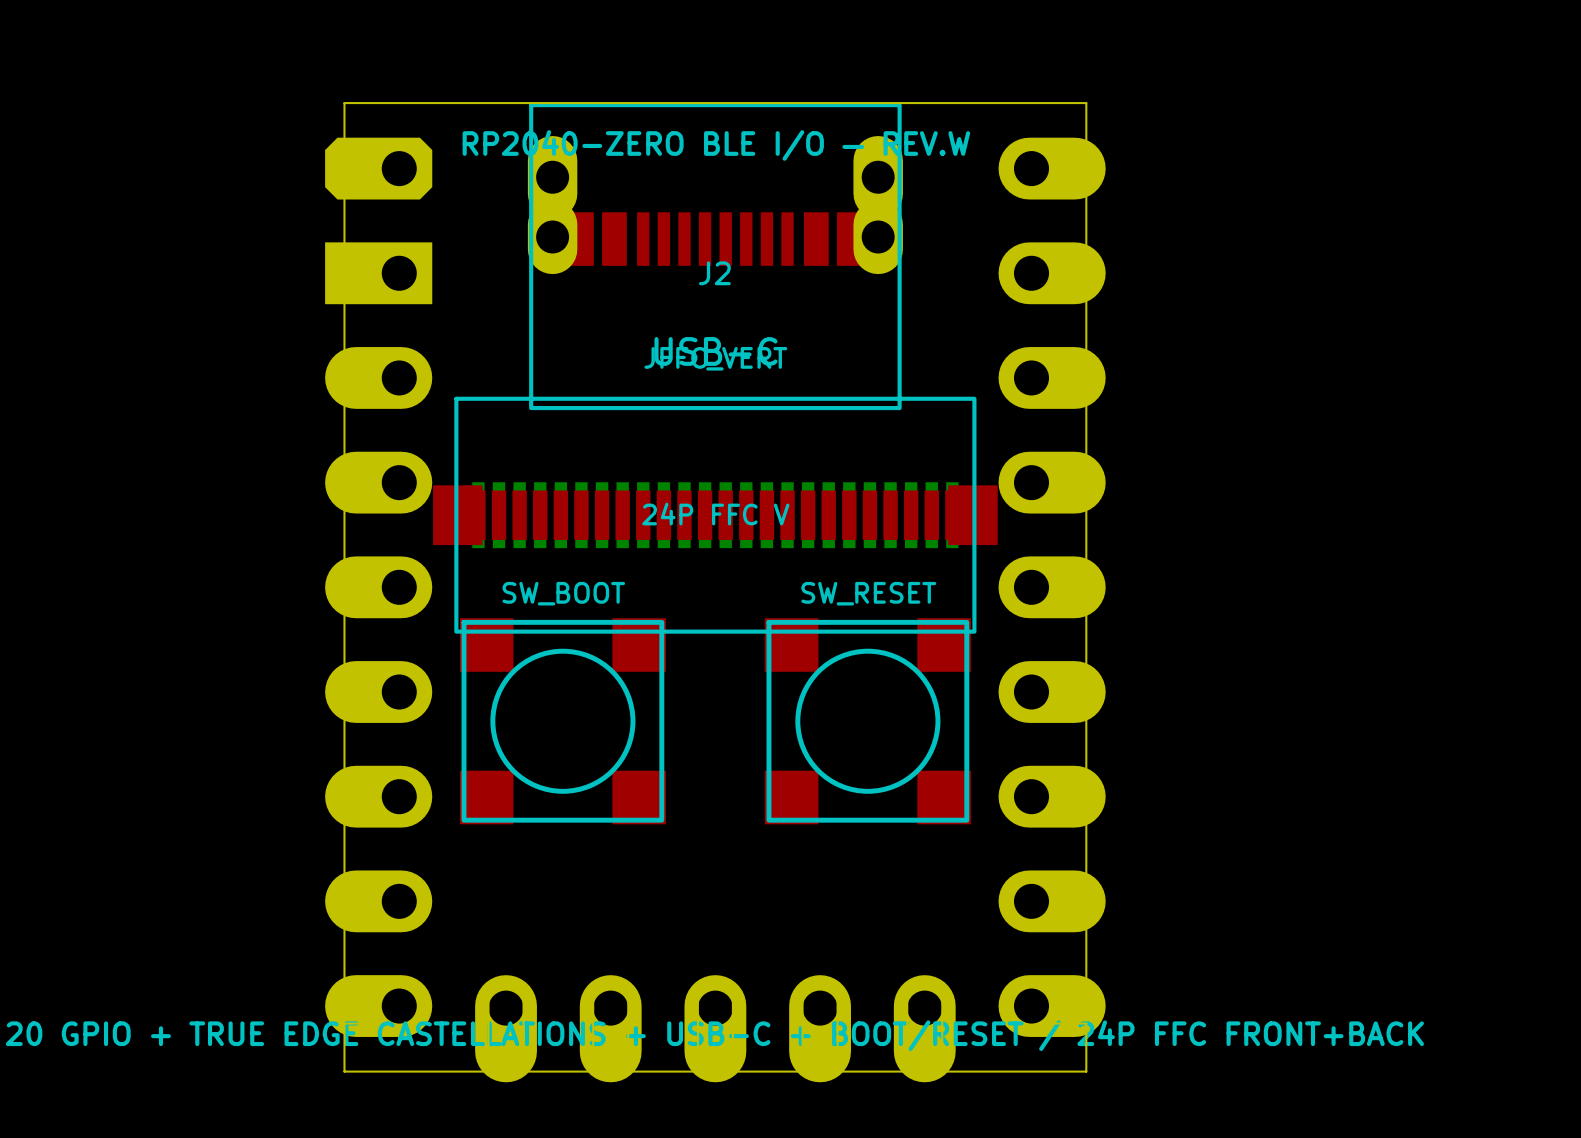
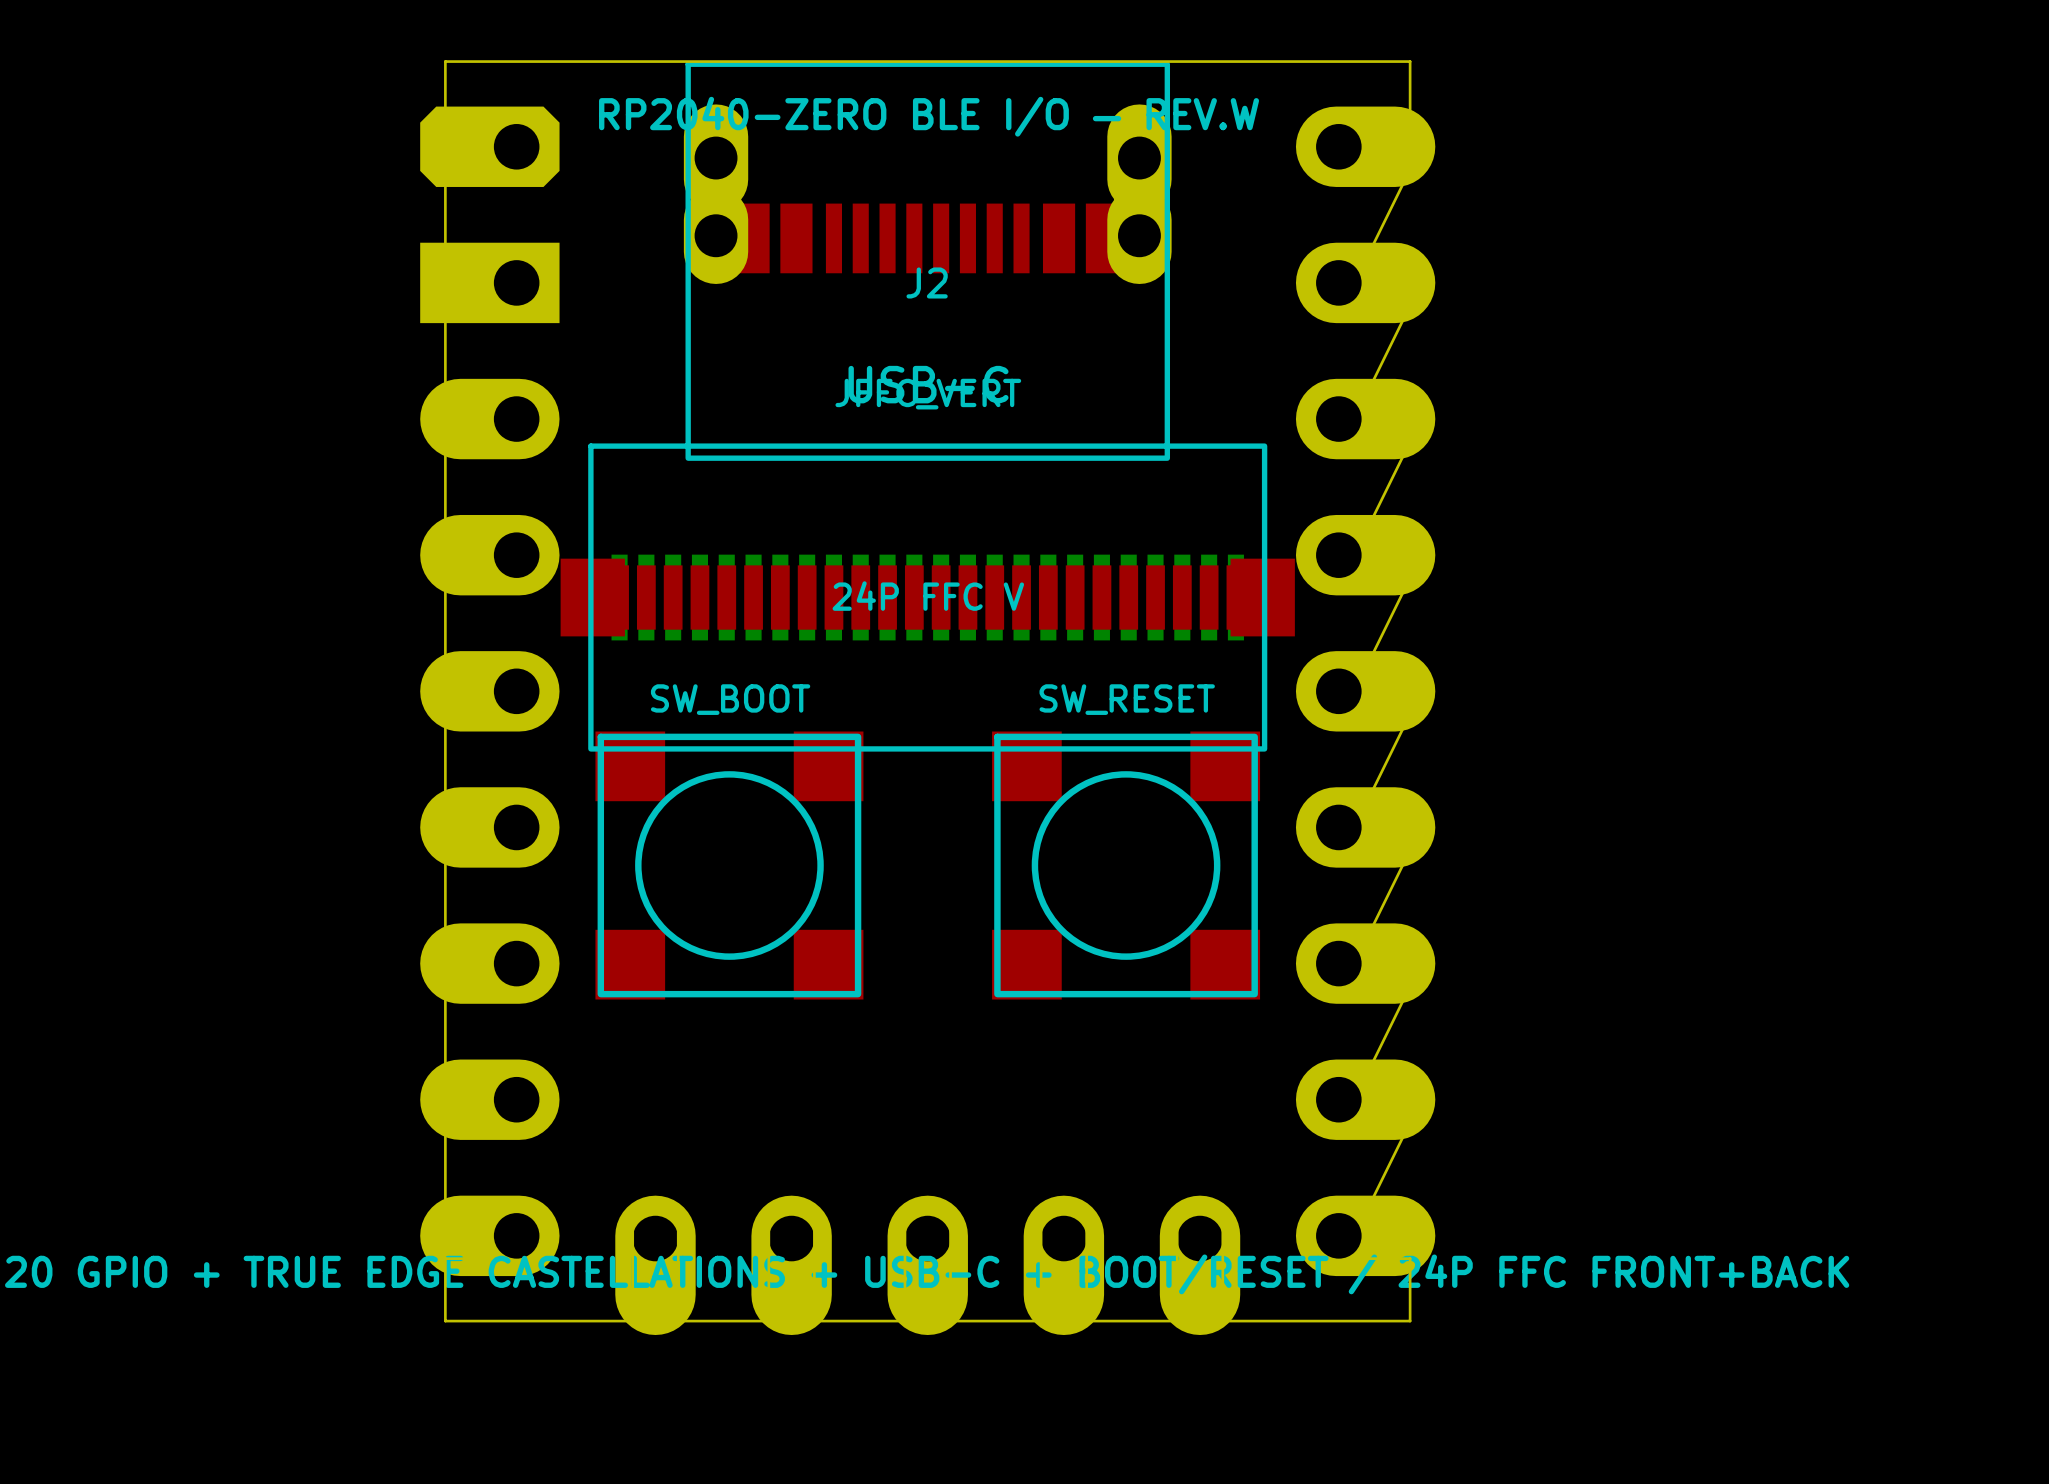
board edge: (1086, 186) (1086, 255) (1052, 255) -> (1410, 169) (1365, 260)
board edge: (1086, 290) (1086, 360) (1052, 360) -> (1410, 305) (1365, 396)
board edge: (1086, 395) (1086, 465) (1052, 465) -> (1410, 441) (1365, 532)
board edge: (1086, 500) (1086, 569) (1052, 569) -> (1410, 577) (1365, 668)
board edge: (1086, 604) (1086, 674) (1052, 674) -> (1410, 714) (1365, 804)
board edge: (1086, 709) (1086, 779) (1052, 779) -> (1410, 850) (1365, 940)
board edge: (1086, 814) (1086, 883) (1052, 883) -> (1410, 986) (1365, 1076)
board edge: (1086, 918) (1086, 988) (1052, 988) -> (1410, 1122) (1365, 1213)

